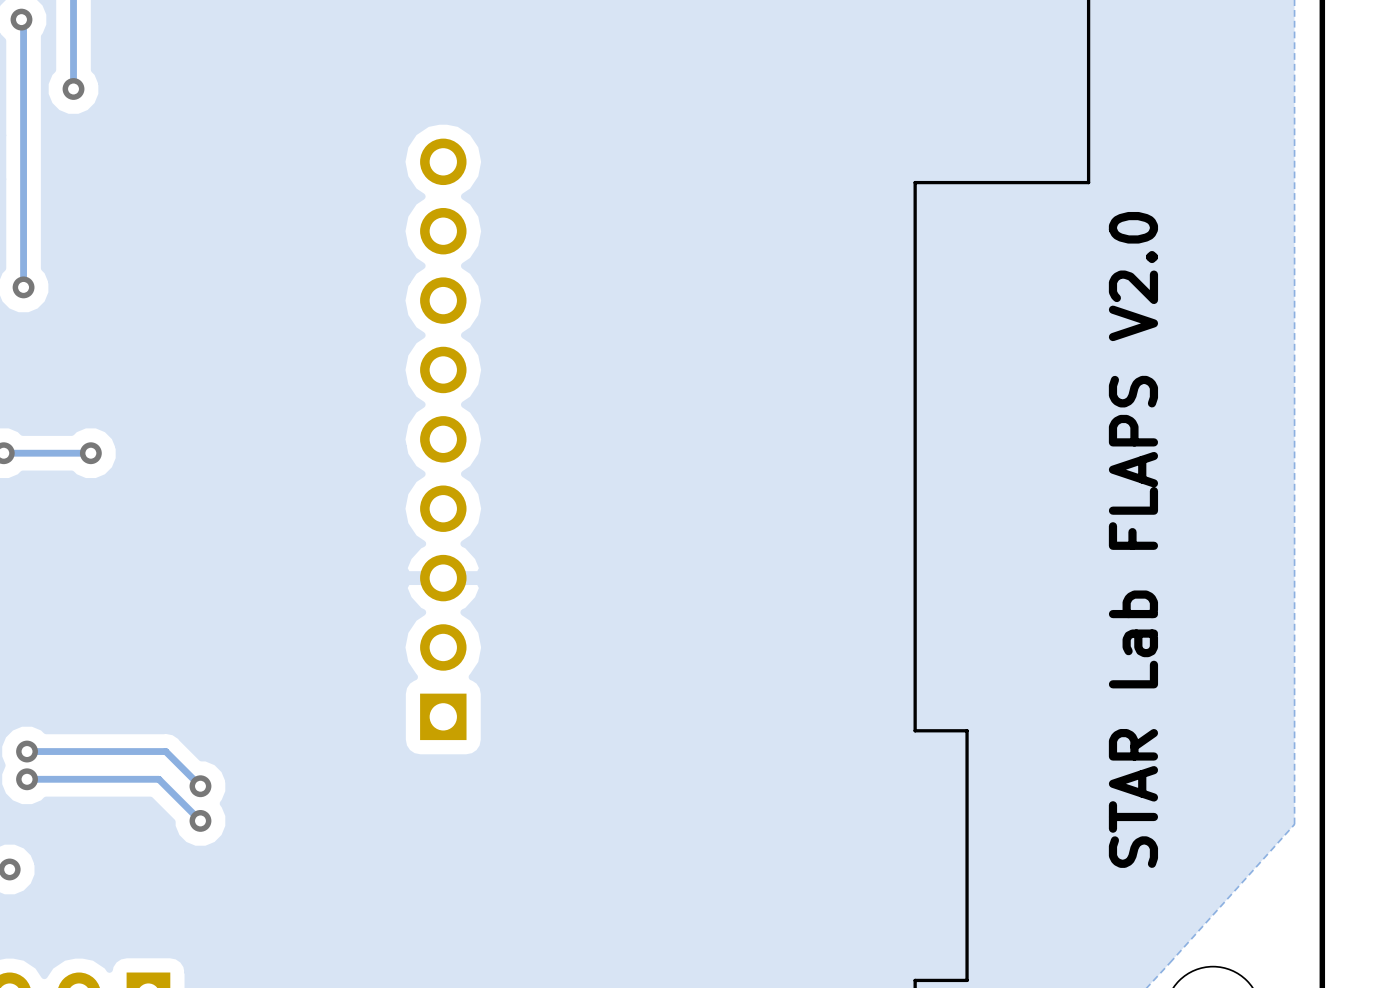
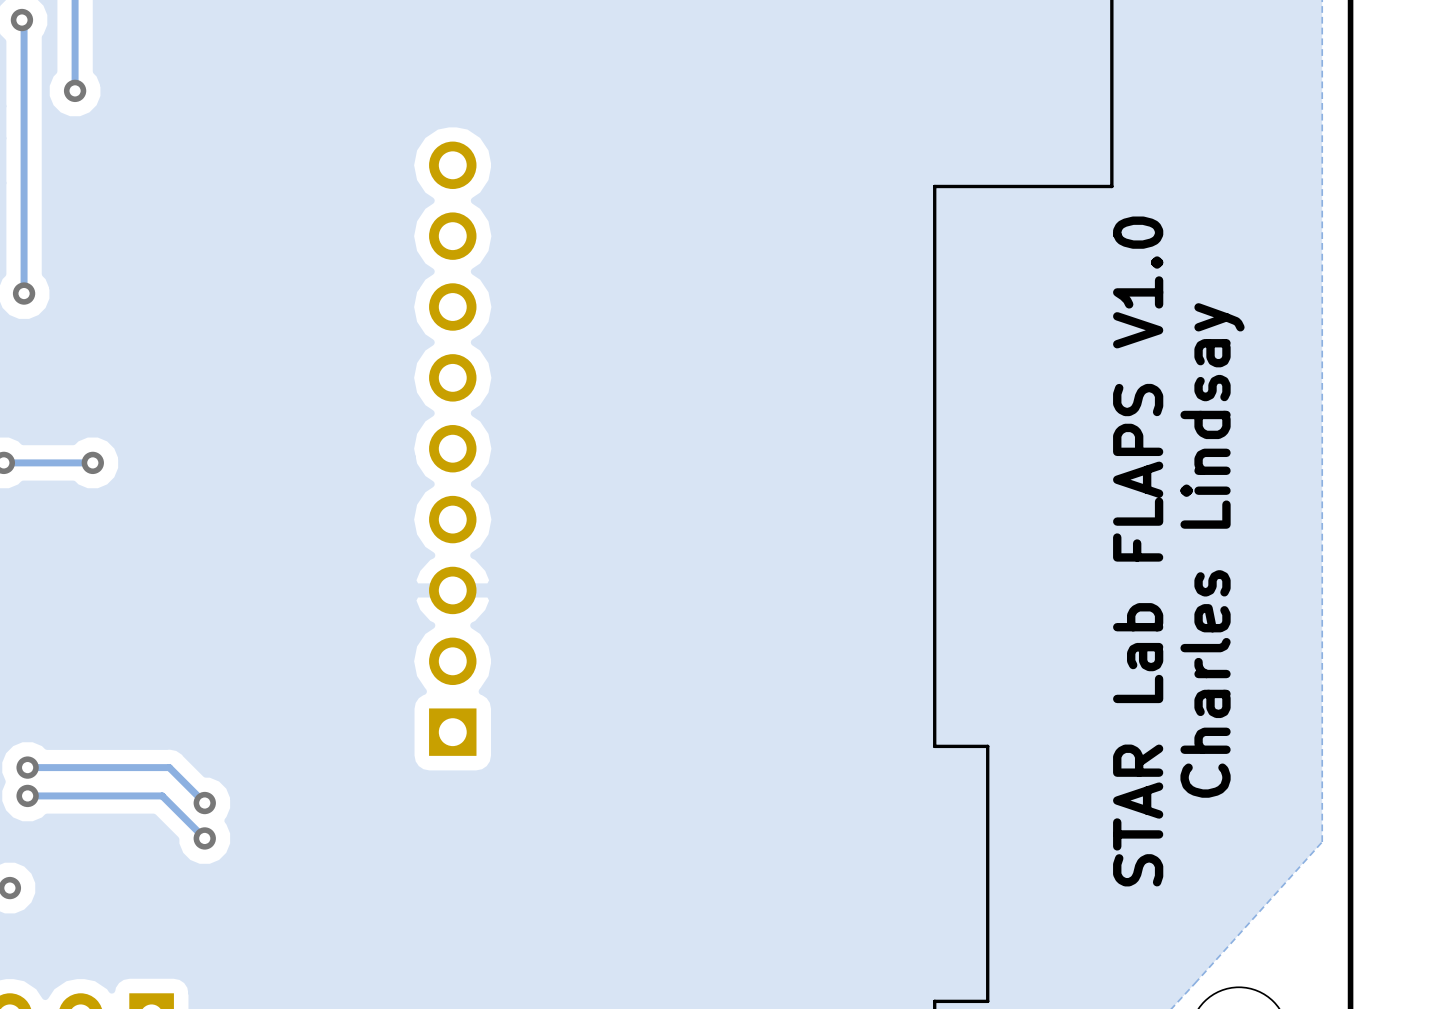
text: none -> Charles Lindsay (1212, 550)
text: STAR Lab FLAPS V2.0 (1133, 539) -> STAR Lab FLAPS V1.0 (1138, 551)

